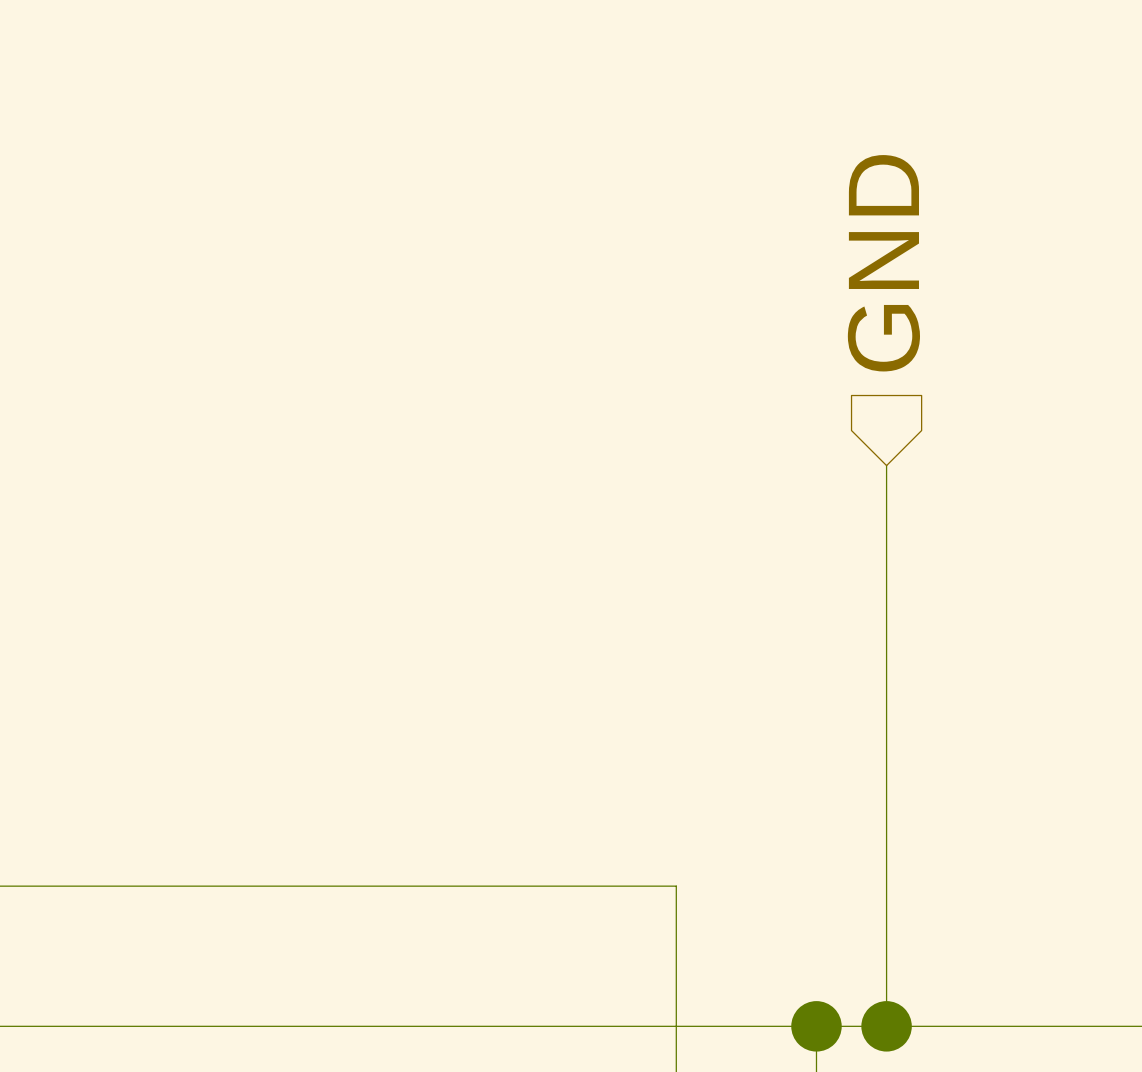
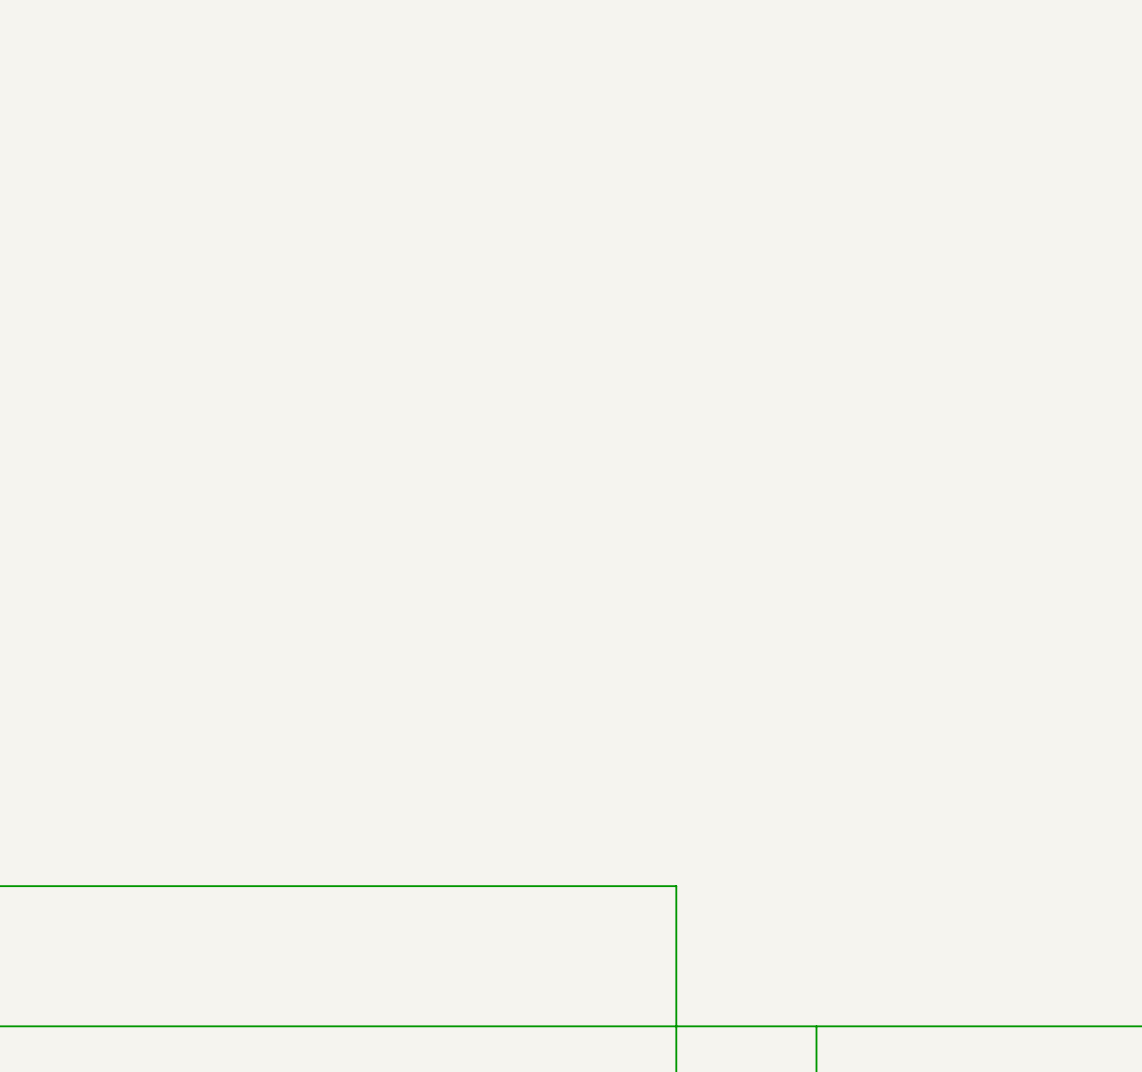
hierarchical label: GND (883, 263) -> none
wire: (886, 465) (886, 1026) -> none
junction: (816, 1026) -> none
junction: (886, 1026) -> none

